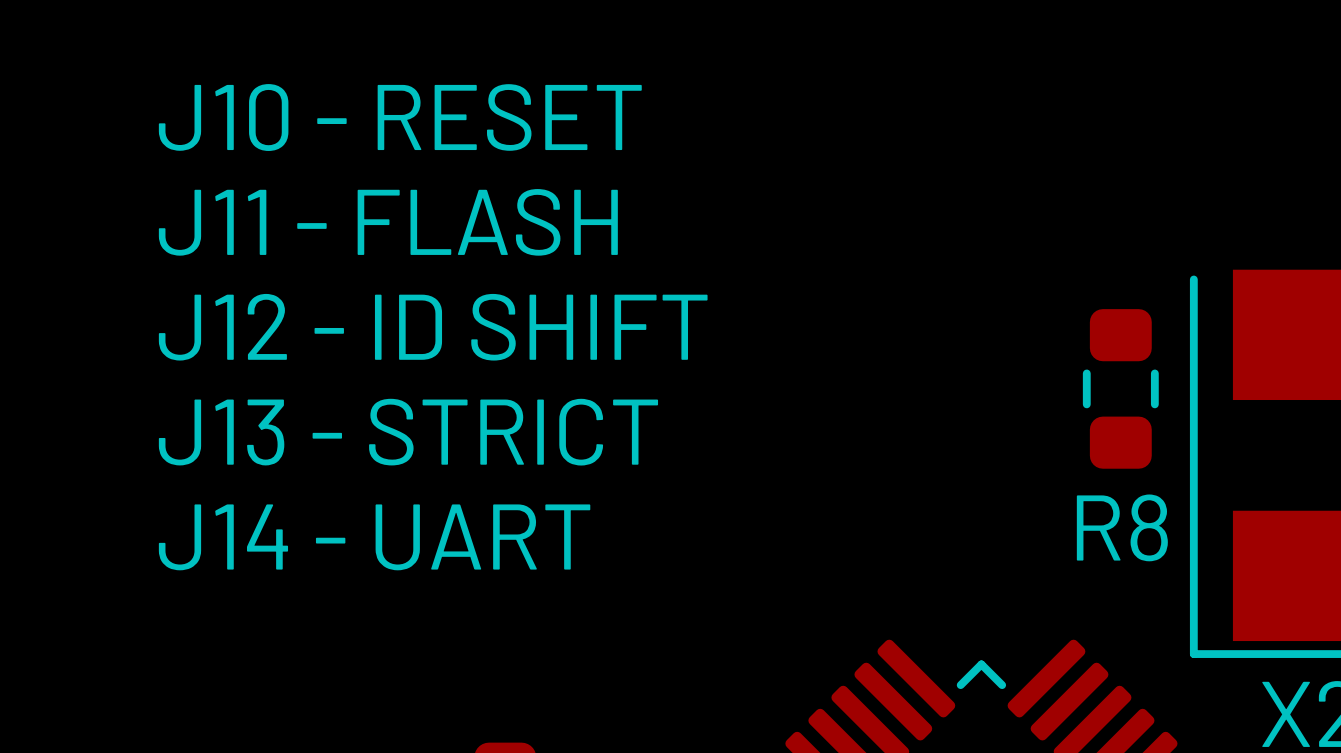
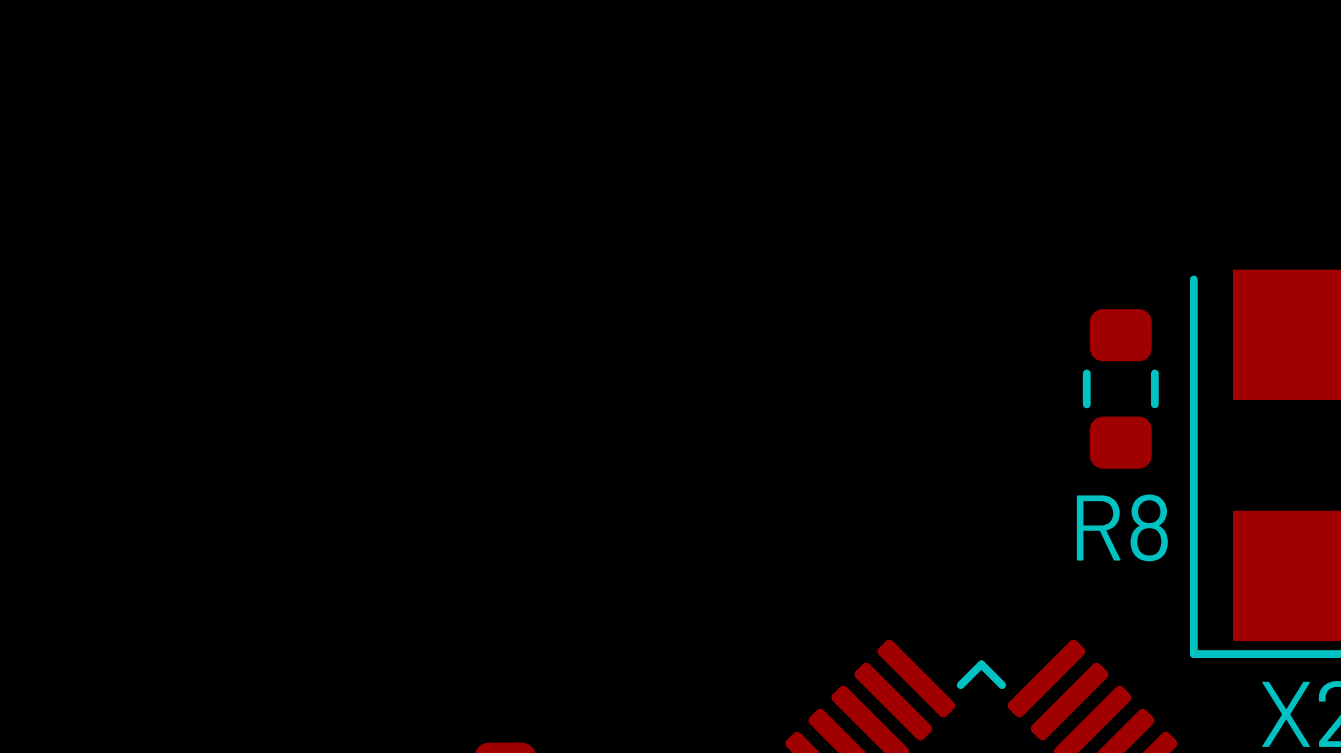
text: J10 - RESET (400, 117) -> none
text: J11 - FLASH (388, 222) -> none
text: J12 - ID SHIFT (433, 327) -> none
text: J13 - STRICT (408, 432) -> none
text: J14 - UART (374, 537) -> none

